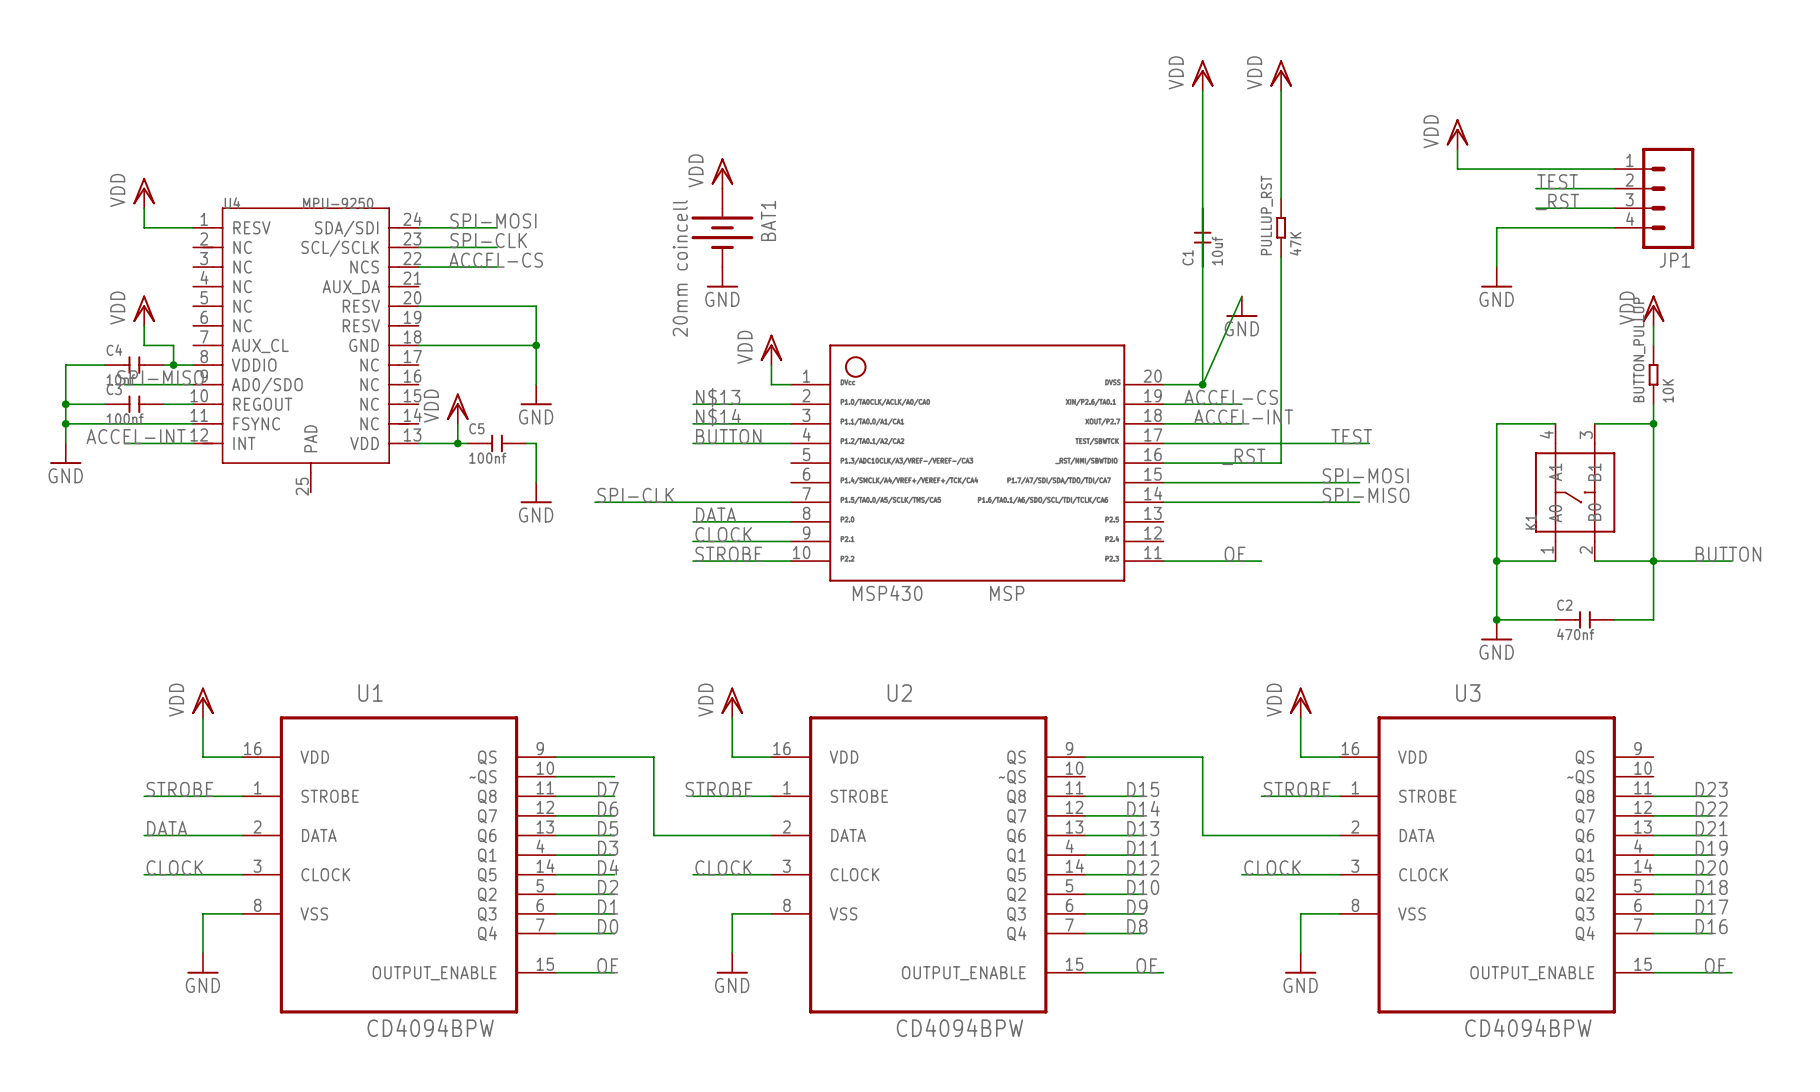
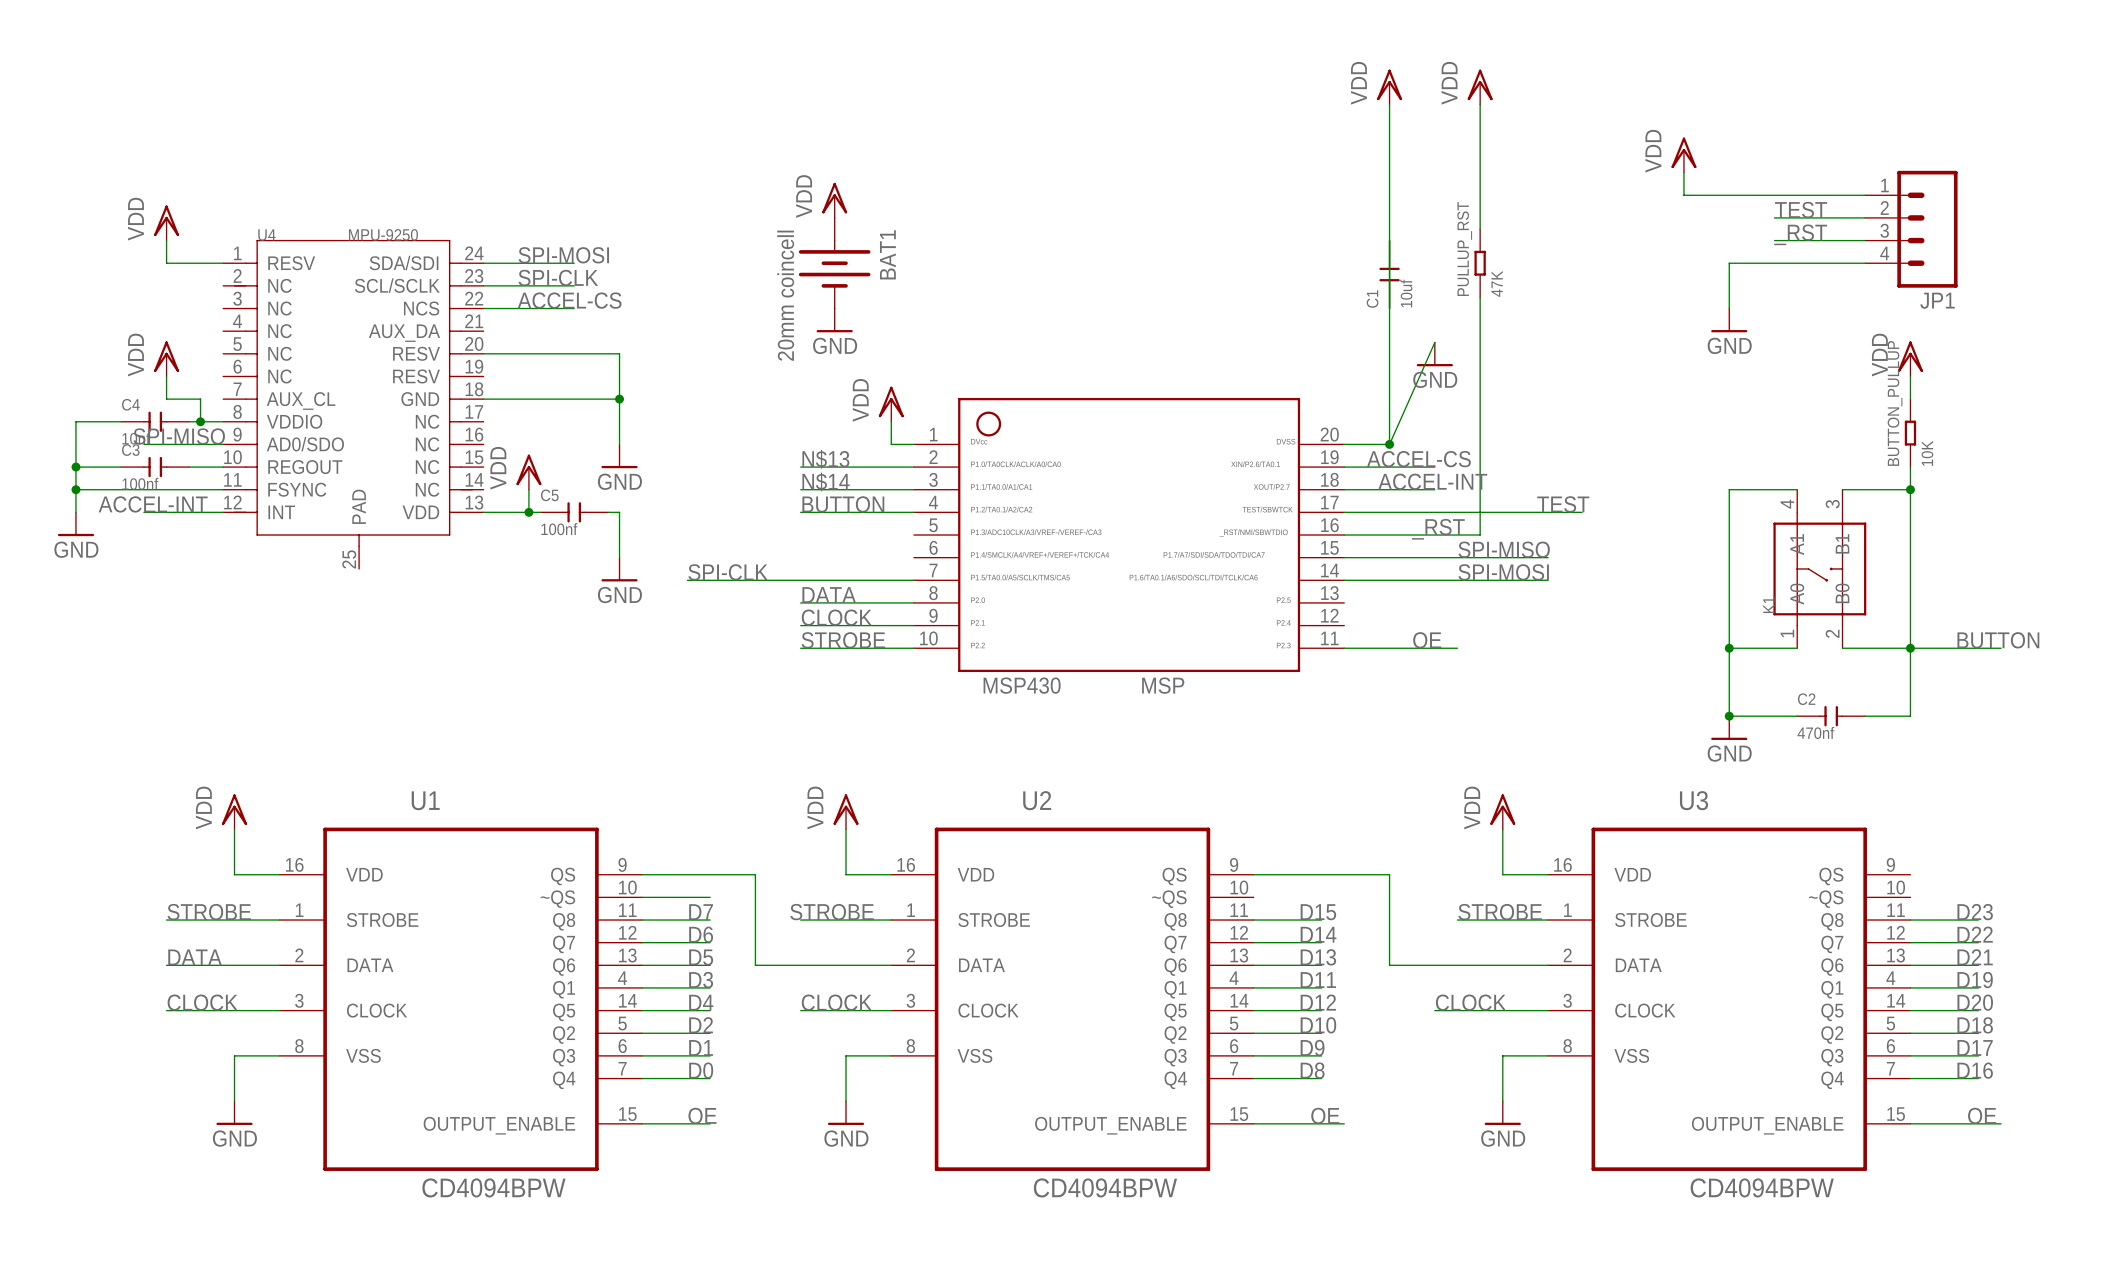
label position: SPI-MOSI (1365, 475) -> SPI-MOSI (1503, 572)
wire: (1339, 482) (1359, 482) -> none
label position: SPI-MISO (1366, 495) -> SPI-MISO (1504, 549)
wire: (1339, 502) (1359, 502) -> none

